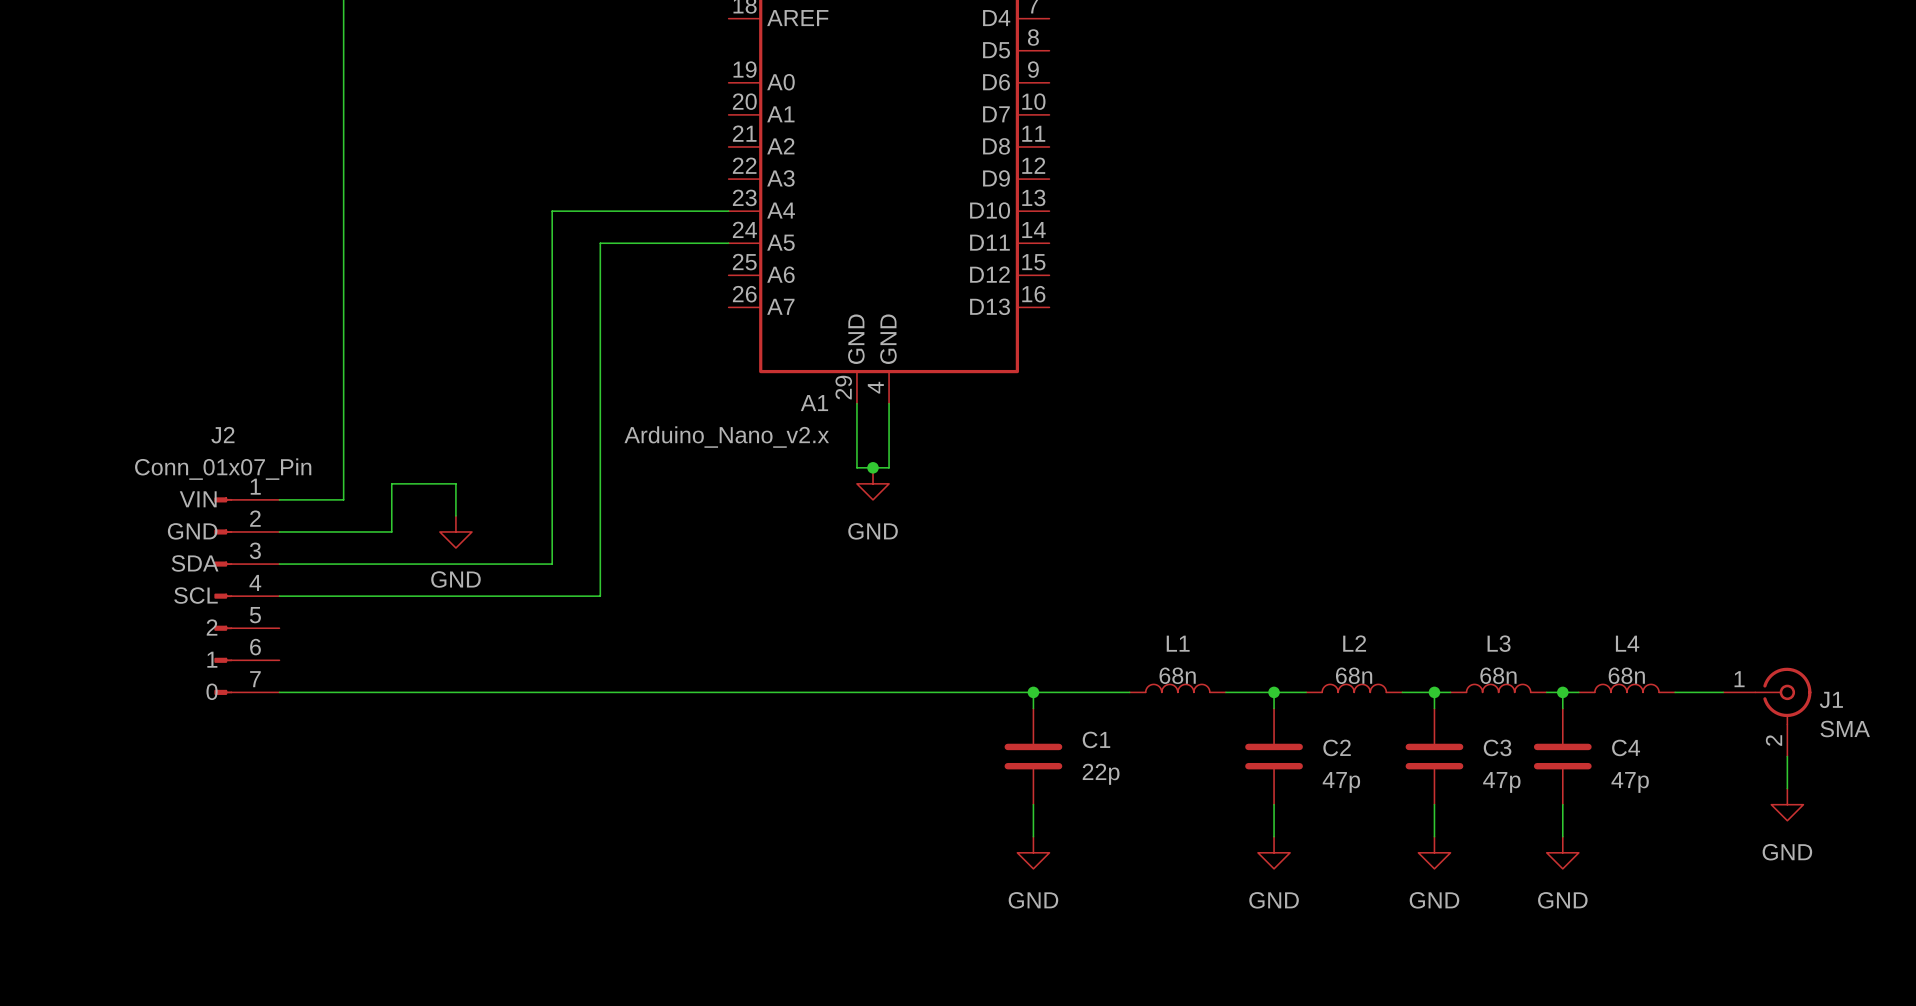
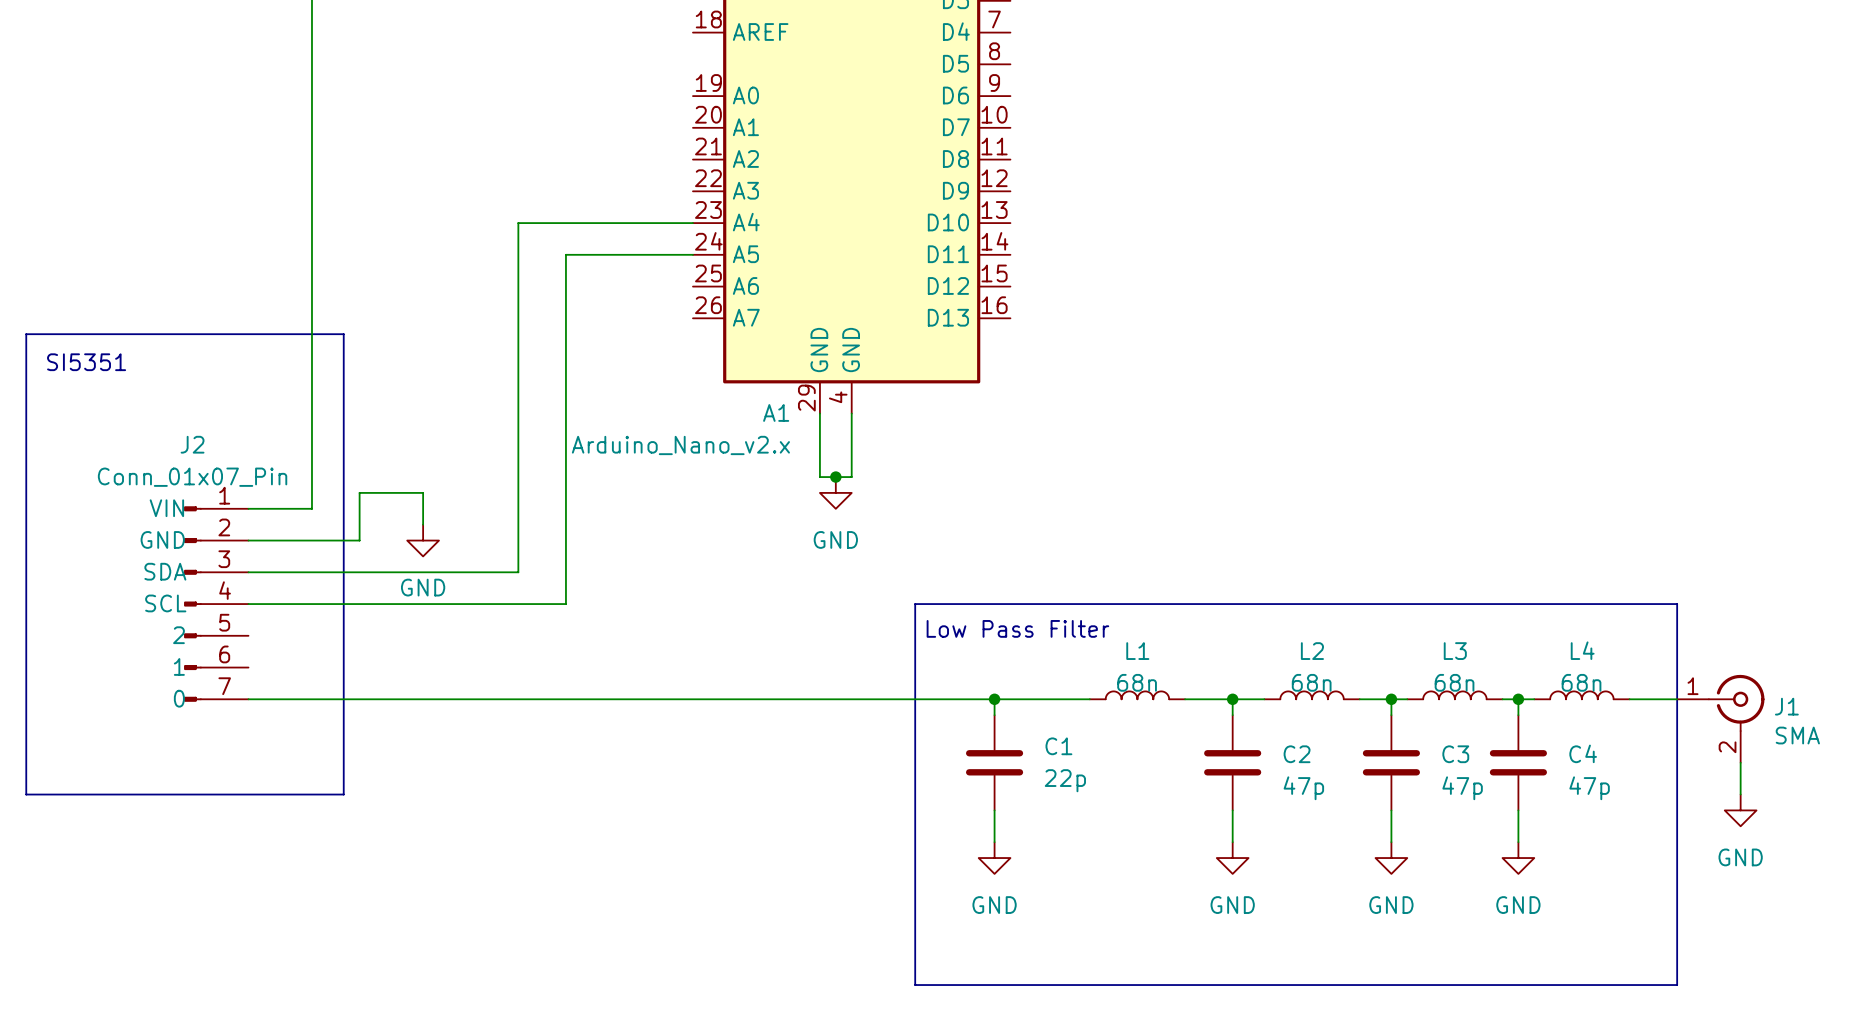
line: none -> (26, 334) (343, 334) (343, 794) (26, 794) (26, 334)
text: none -> SI5351 (86, 362)
line: none -> (915, 604) (1677, 604) (1677, 985) (915, 985) (915, 604)
text: none -> Low Pass Filter (1017, 628)

